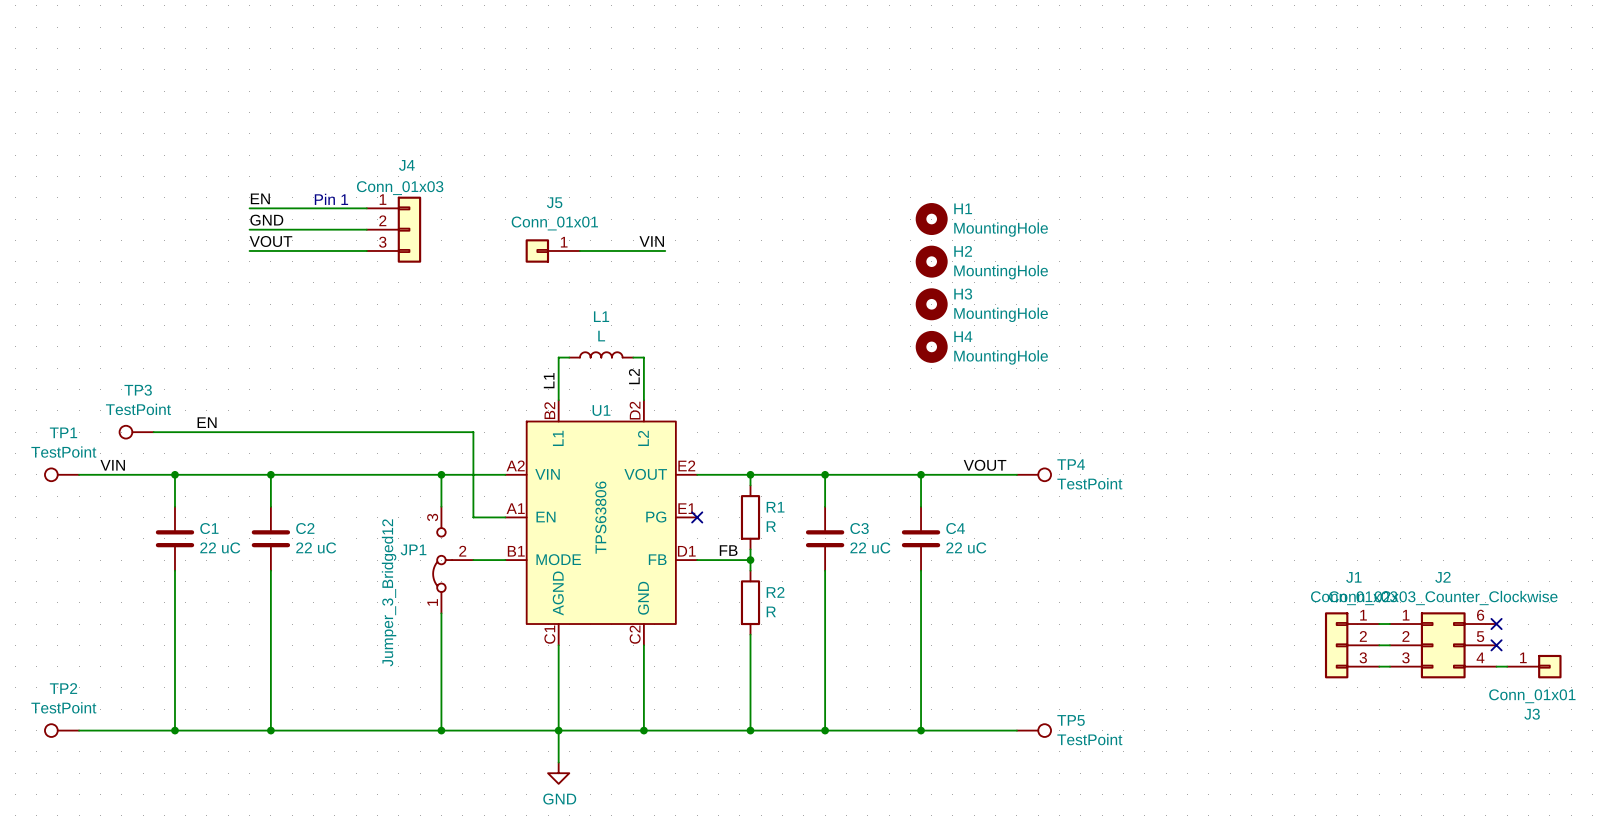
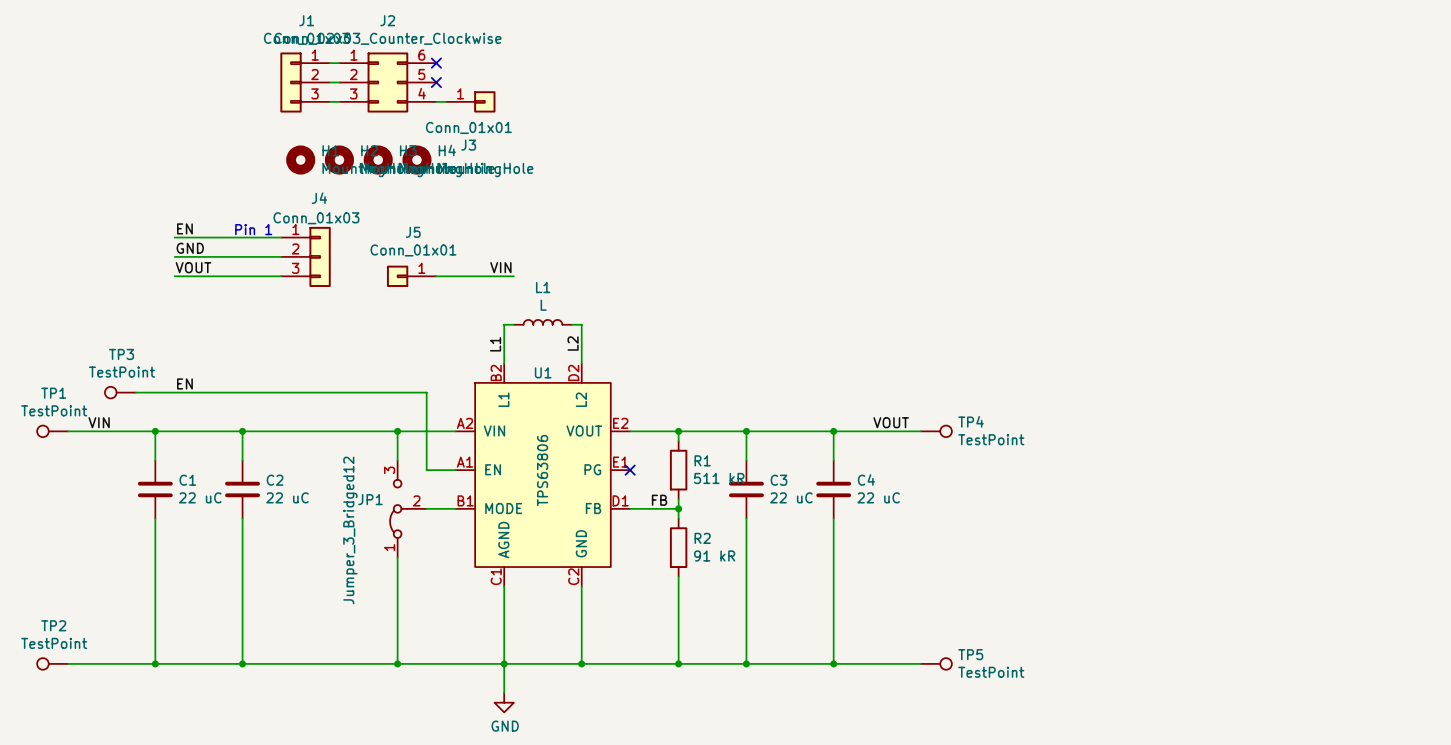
wire: none -> (329, 63) (339, 63)
no-connect mark: none -> (436, 63)
wire: none -> (329, 82) (339, 82)
no-connect mark: none -> (436, 82)
wire: none -> (329, 101) (339, 101)
wire: none -> (436, 101) (446, 101)
label position: EN (260, 198) -> EN (184, 228)
text position: Pin 1 (331, 199) -> Pin 1 (253, 229)
wire: (249, 208) (366, 208) -> (174, 237) (281, 237)
H1 position: (931, 219) -> (300, 160)
label position: GND (266, 220) -> GND (190, 248)
wire: (249, 229) (366, 229) -> (174, 256) (281, 256)
J4 position: (394, 229) -> (306, 256)
label position: VOUT (270, 241) -> VOUT (193, 267)
label position: VIN (651, 241) -> VIN (500, 267)
wire: (249, 250) (366, 250) -> (174, 276) (281, 276)
J5 position: (552, 250) -> (411, 276)
wire: (579, 250) (665, 250) -> (436, 276) (513, 276)
H2 position: (931, 261) -> (339, 160)
H3 position: (931, 304) -> (378, 160)
H4 position: (931, 346) -> (416, 160)
R1 value: R (771, 526) -> 511 kR (719, 478)
R2 value: R (771, 611) -> 91 kR (714, 556)
wire: (1379, 624) (1389, 624) -> none
no-connect mark: (1496, 624) -> none
J1 position: (1352, 645) -> (305, 82)
wire: (1379, 645) (1389, 645) -> none
J2 position: (1443, 645) -> (387, 82)
no-connect mark: (1496, 645) -> none
wire: (1379, 666) (1389, 666) -> none
wire: (1496, 666) (1507, 666) -> none
J3 position: (1534, 666) -> (470, 101)

